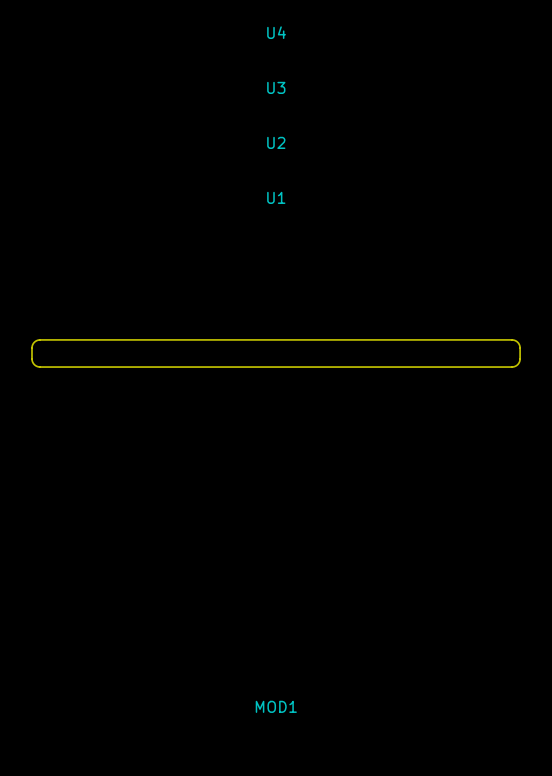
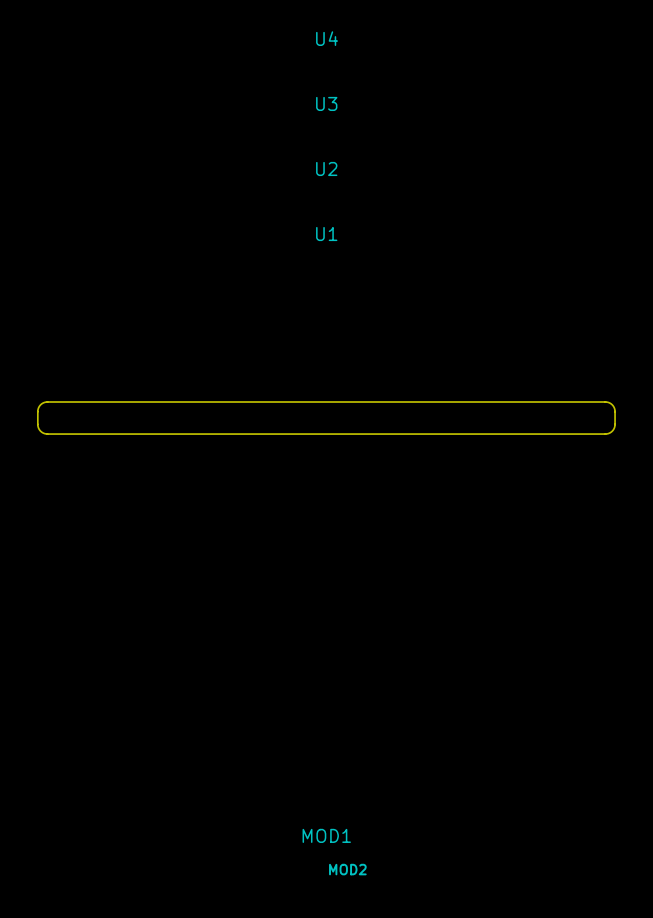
MOD2: none -> (347, 869)

